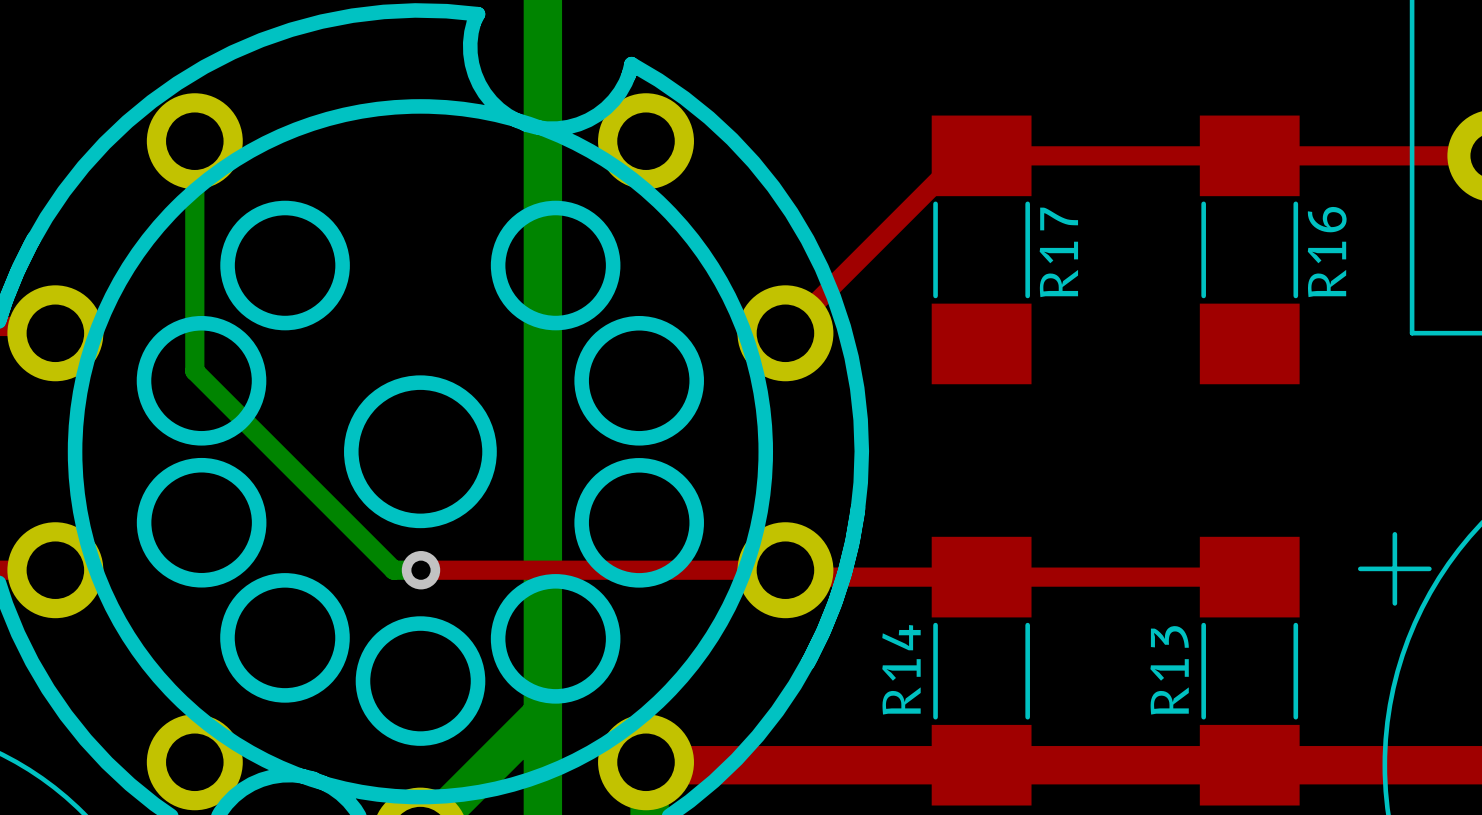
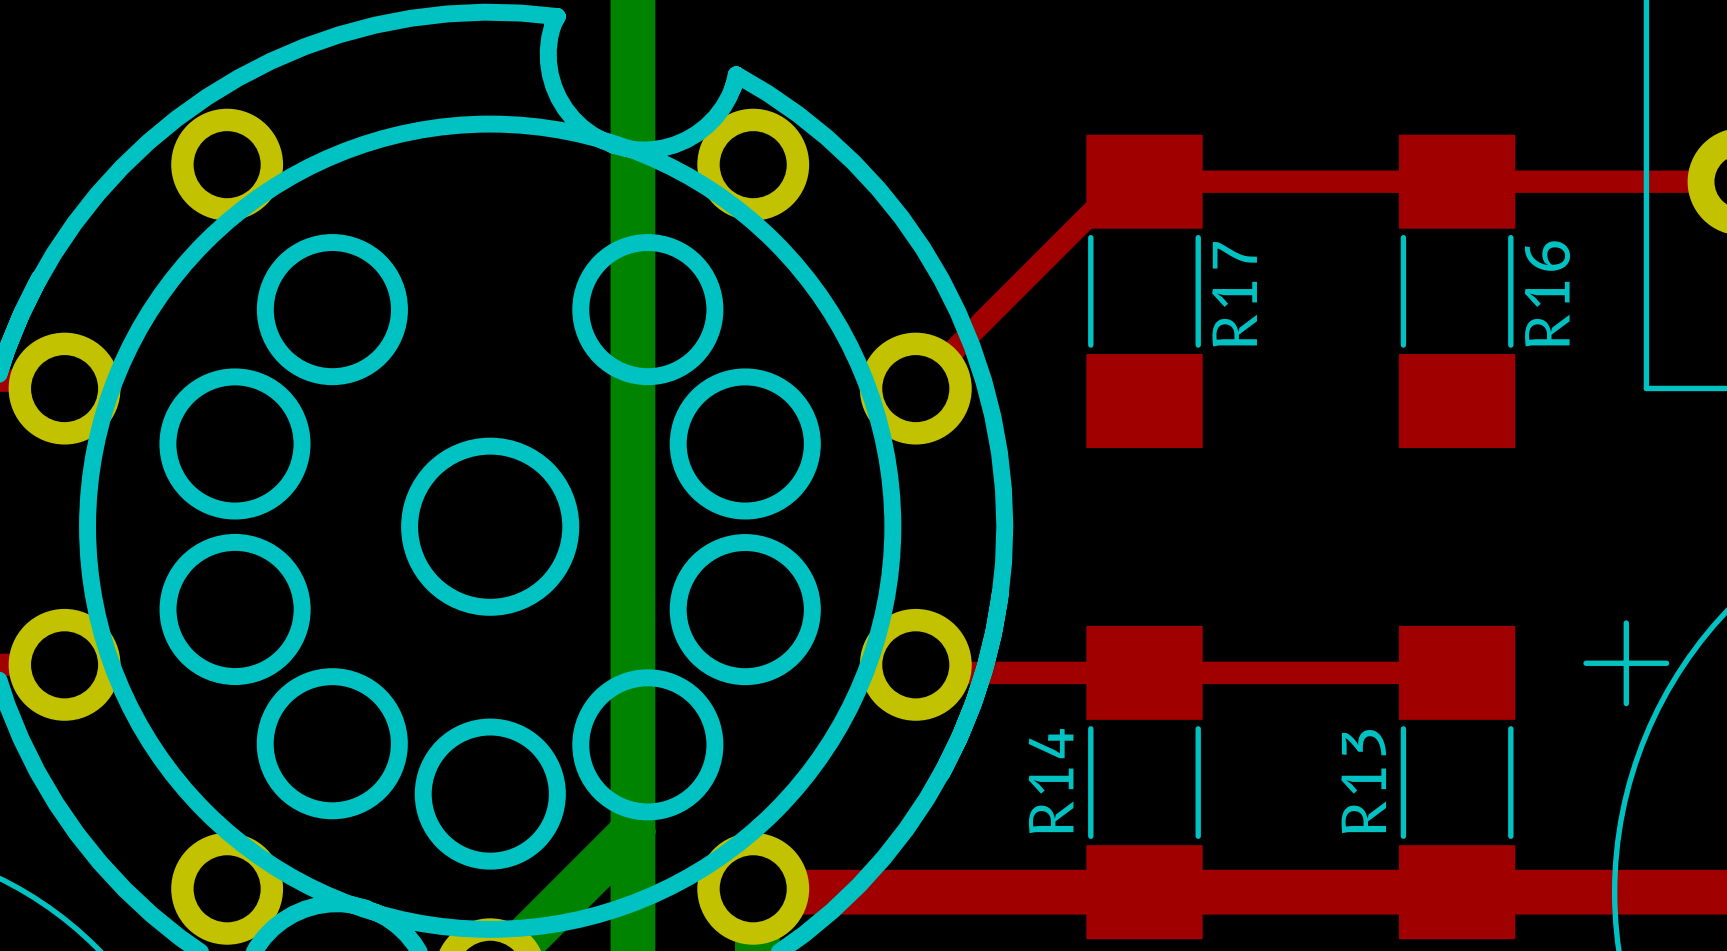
bottom track: (194, 141) (194, 371) (393, 570) (420, 570) -> none
top track: (420, 570) (785, 570) -> none
via: (420, 570) -> none

